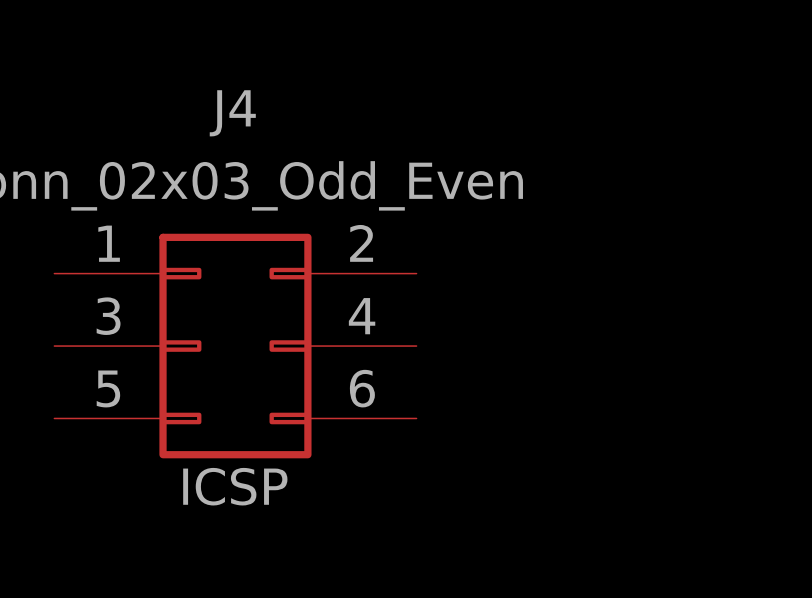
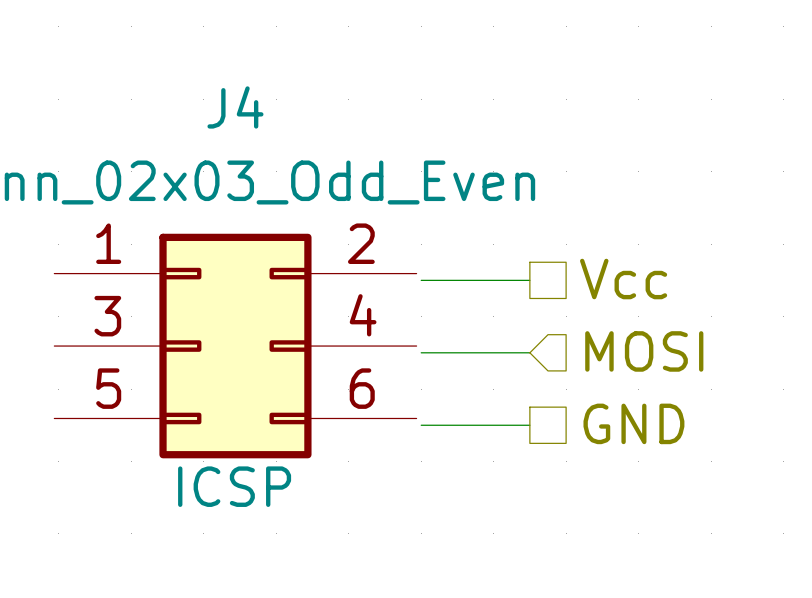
hierarchical label: none -> Vcc (623, 279)
wire: none -> (421, 280) (529, 280)
hierarchical label: none -> MOSI (644, 351)
wire: none -> (421, 352) (529, 352)
hierarchical label: none -> GND (633, 423)
wire: none -> (421, 425) (529, 425)

